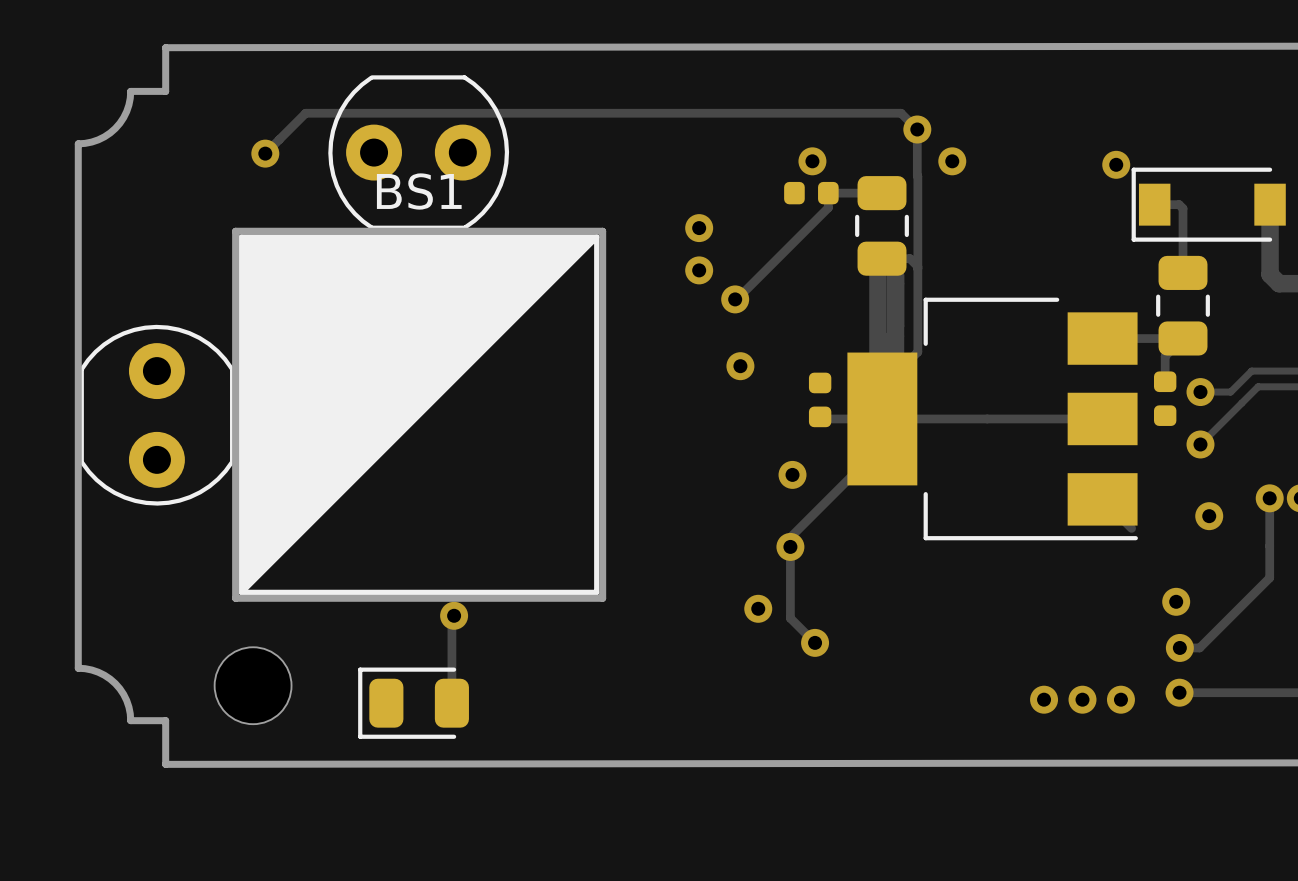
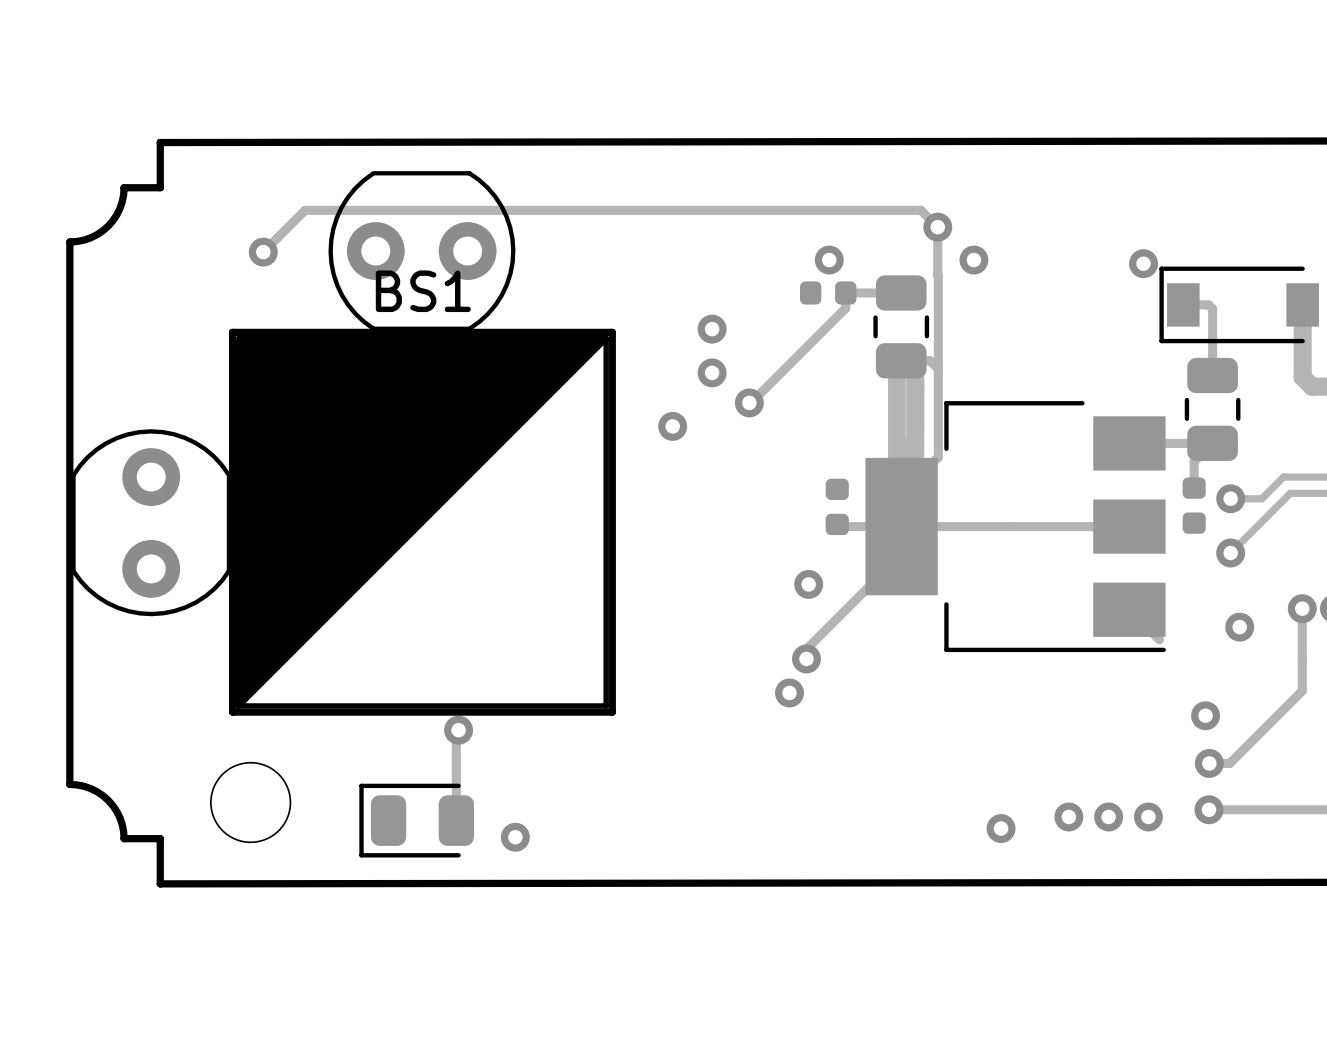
via position: (740, 366) -> (672, 426)
track: (790, 546) (790, 618) (815, 642) -> none
via position: (758, 608) -> (789, 692)
via: (815, 642) -> none
via: none -> (1001, 828)
via: none -> (515, 837)

